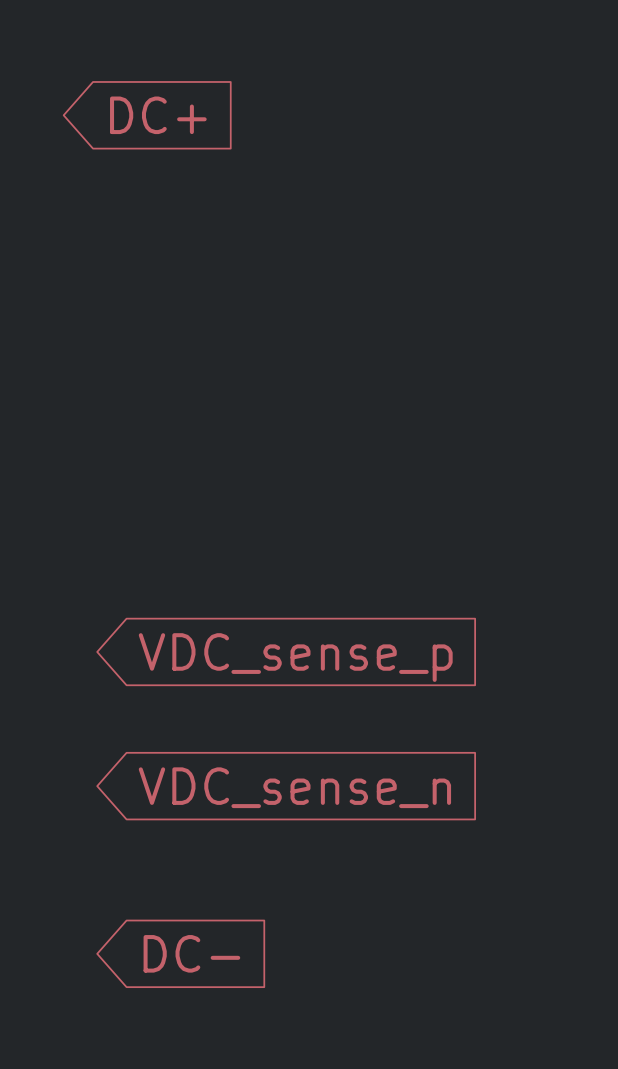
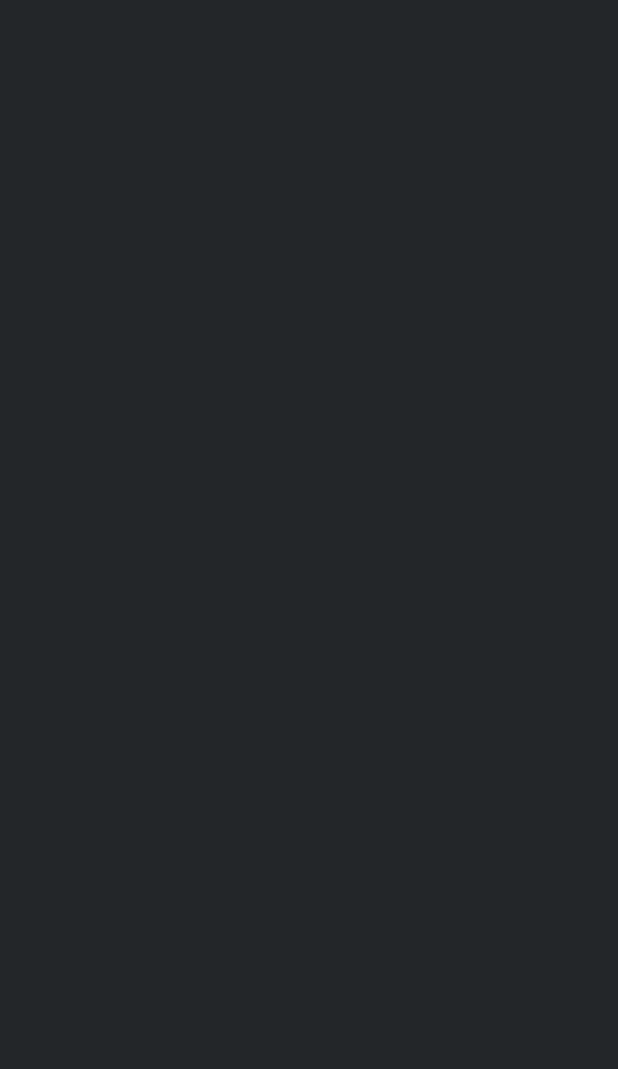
global label: DC+ (158, 115) -> none
global label: VDC_sense_p (295, 657) -> none
global label: VDC_sense_n (294, 787) -> none
global label: DC- (191, 953) -> none

